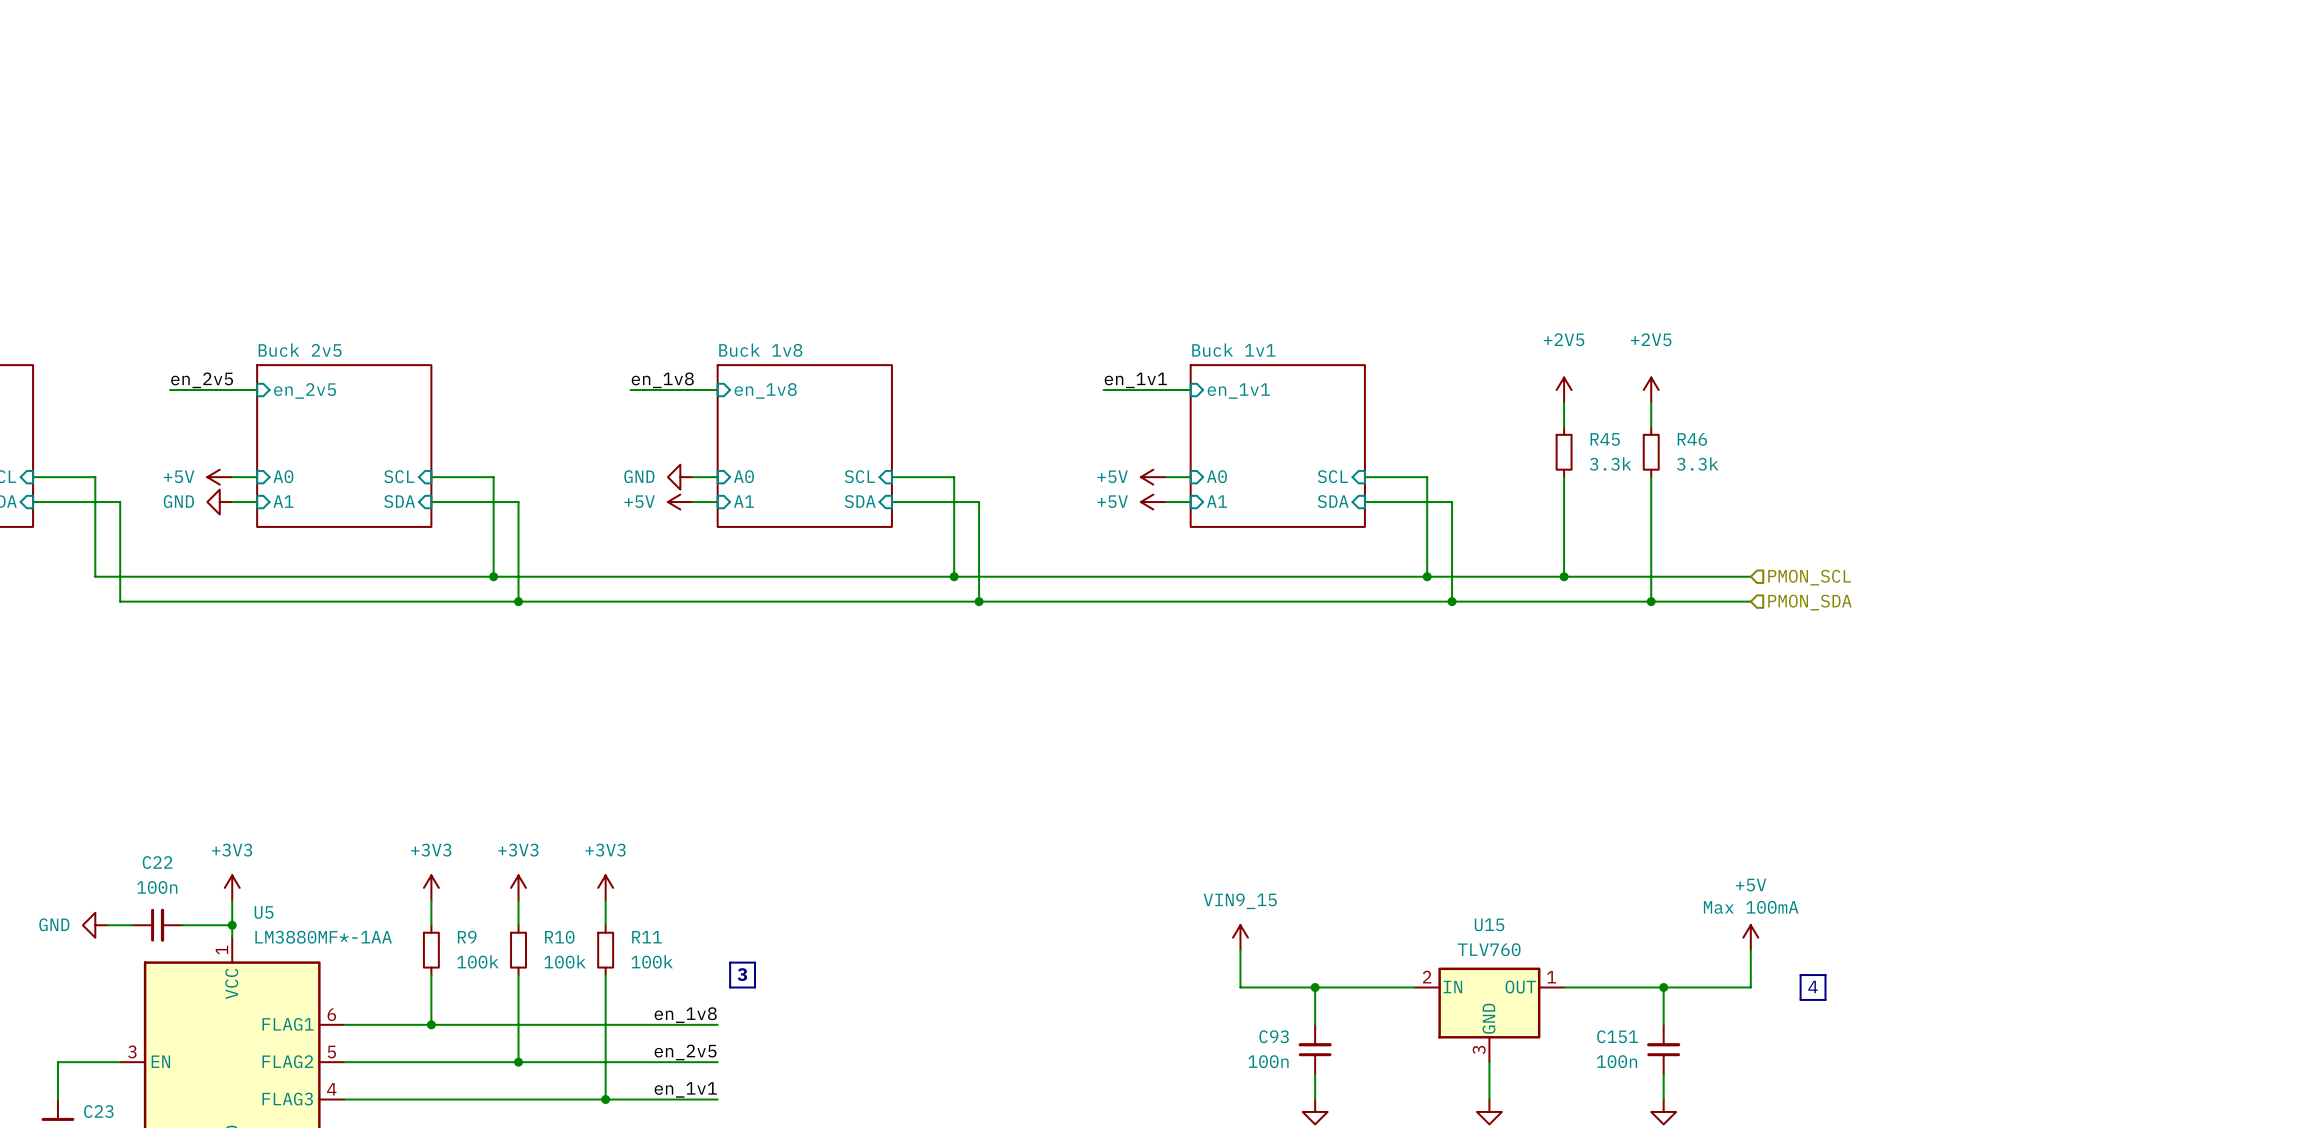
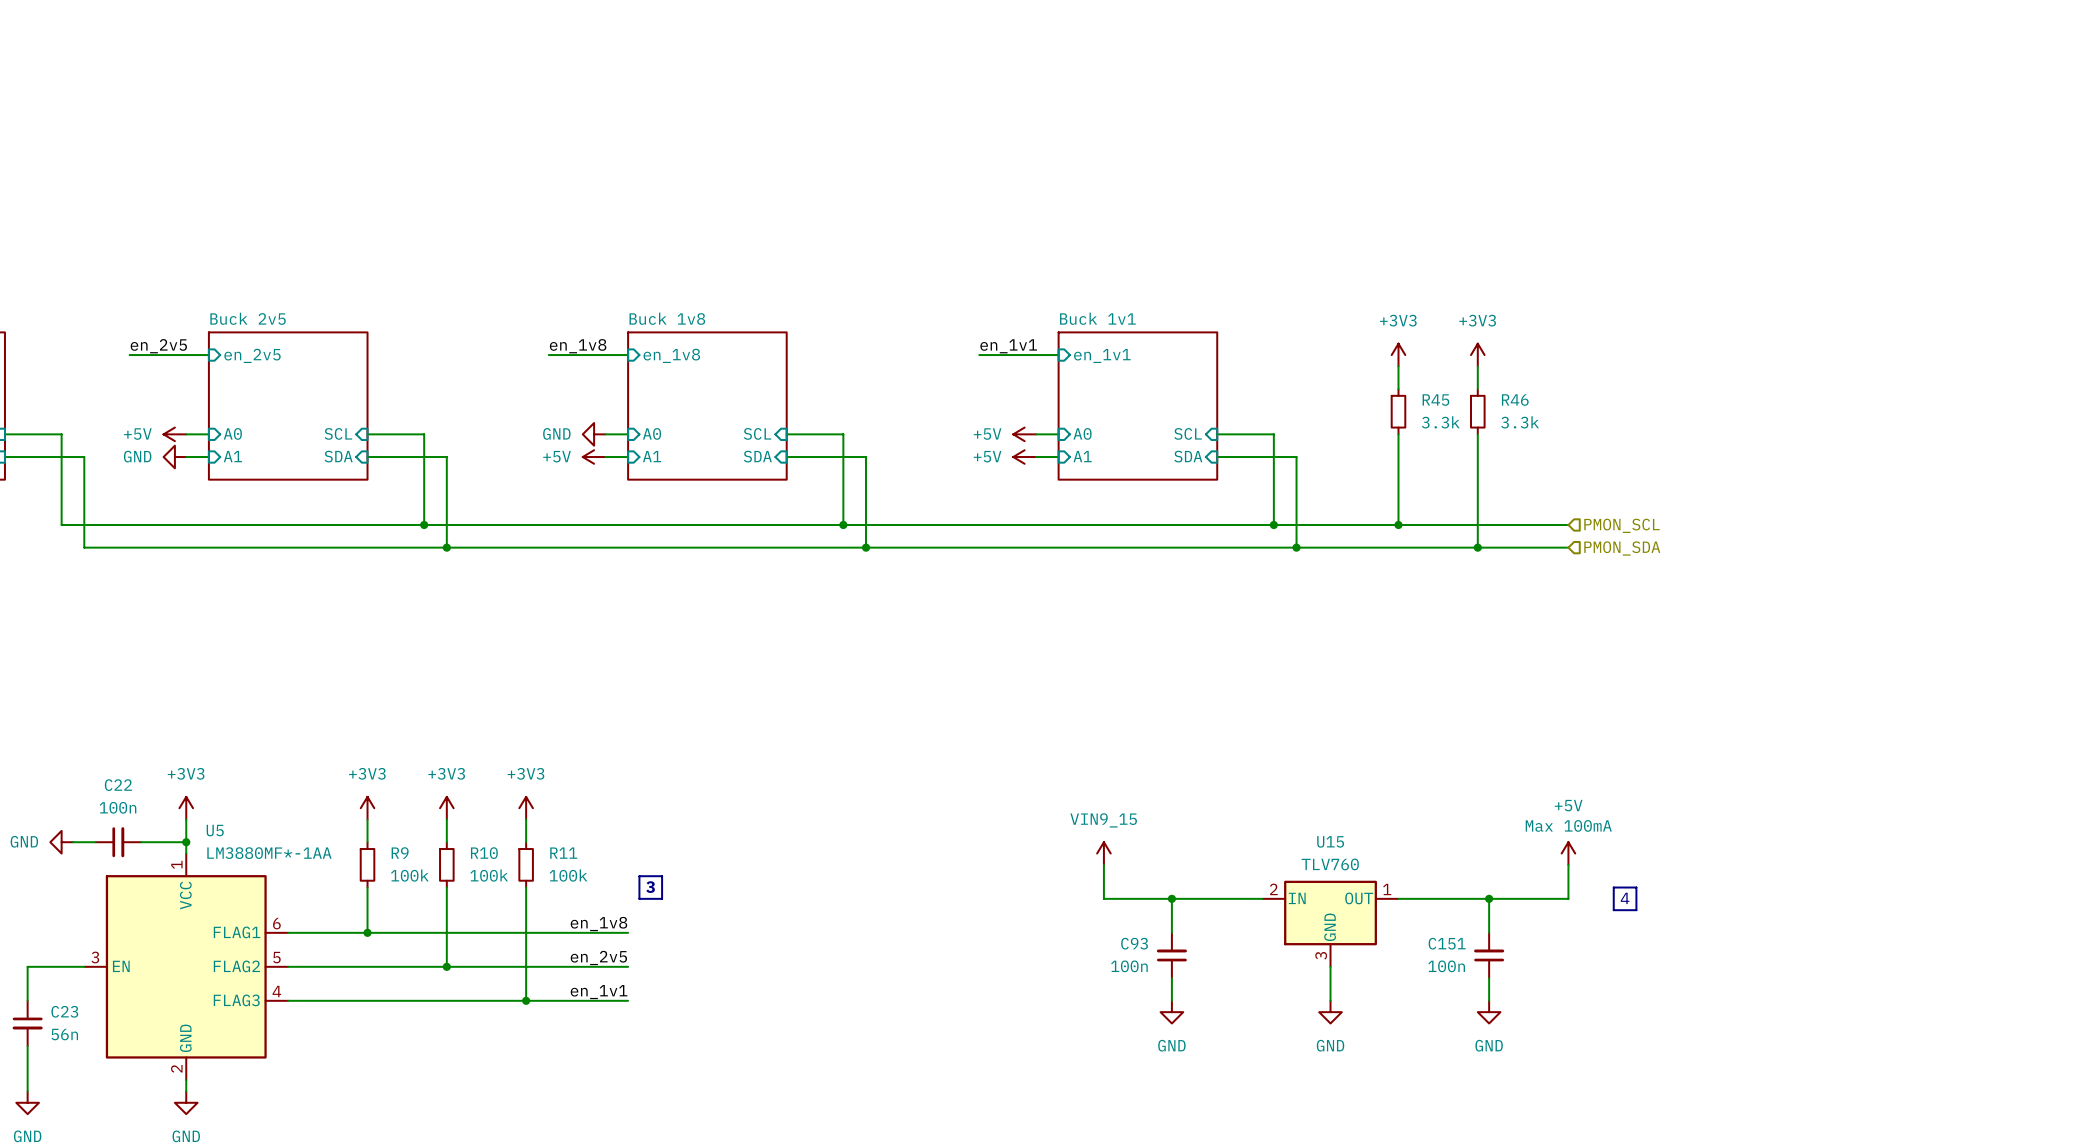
power symbol: +2V5 (1564, 390) -> +3V3 (1398, 355)
power symbol: +2V5 (1651, 390) -> +3V3 (1477, 355)

